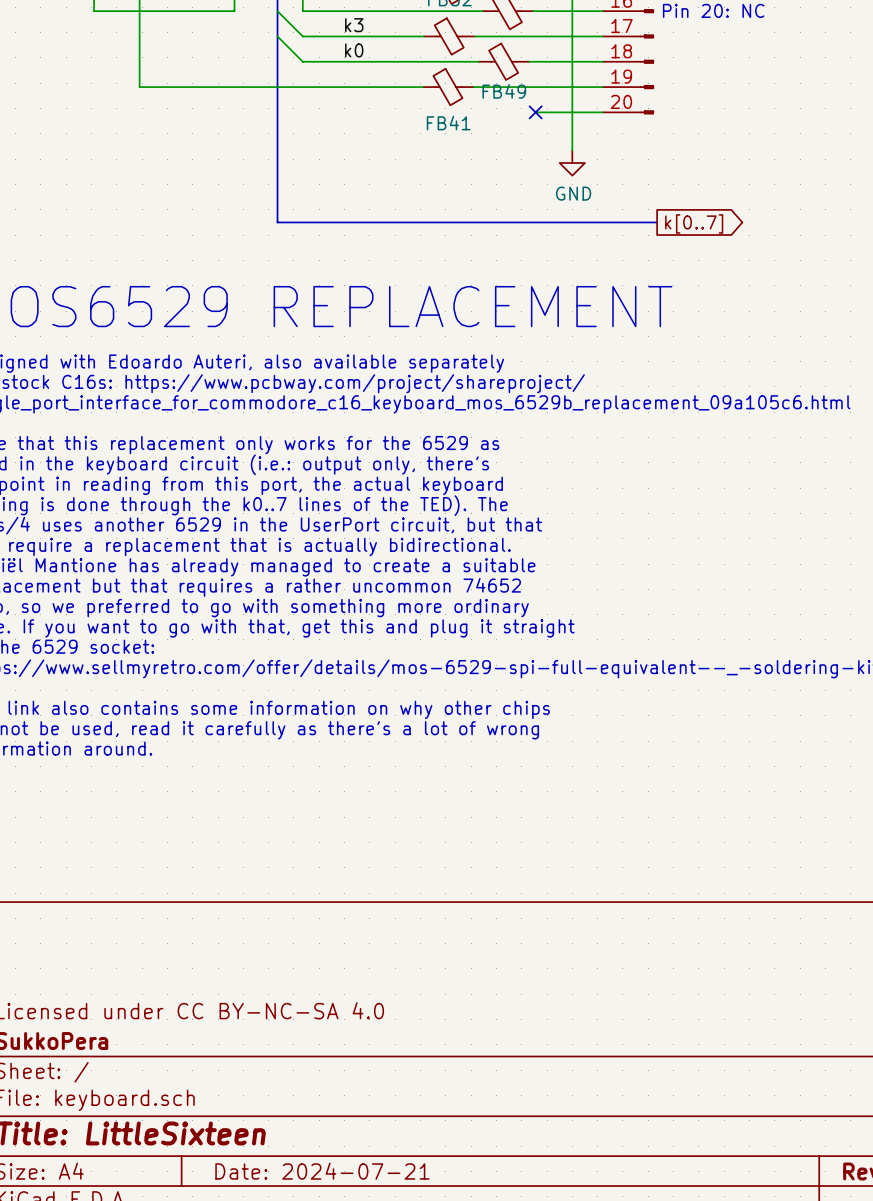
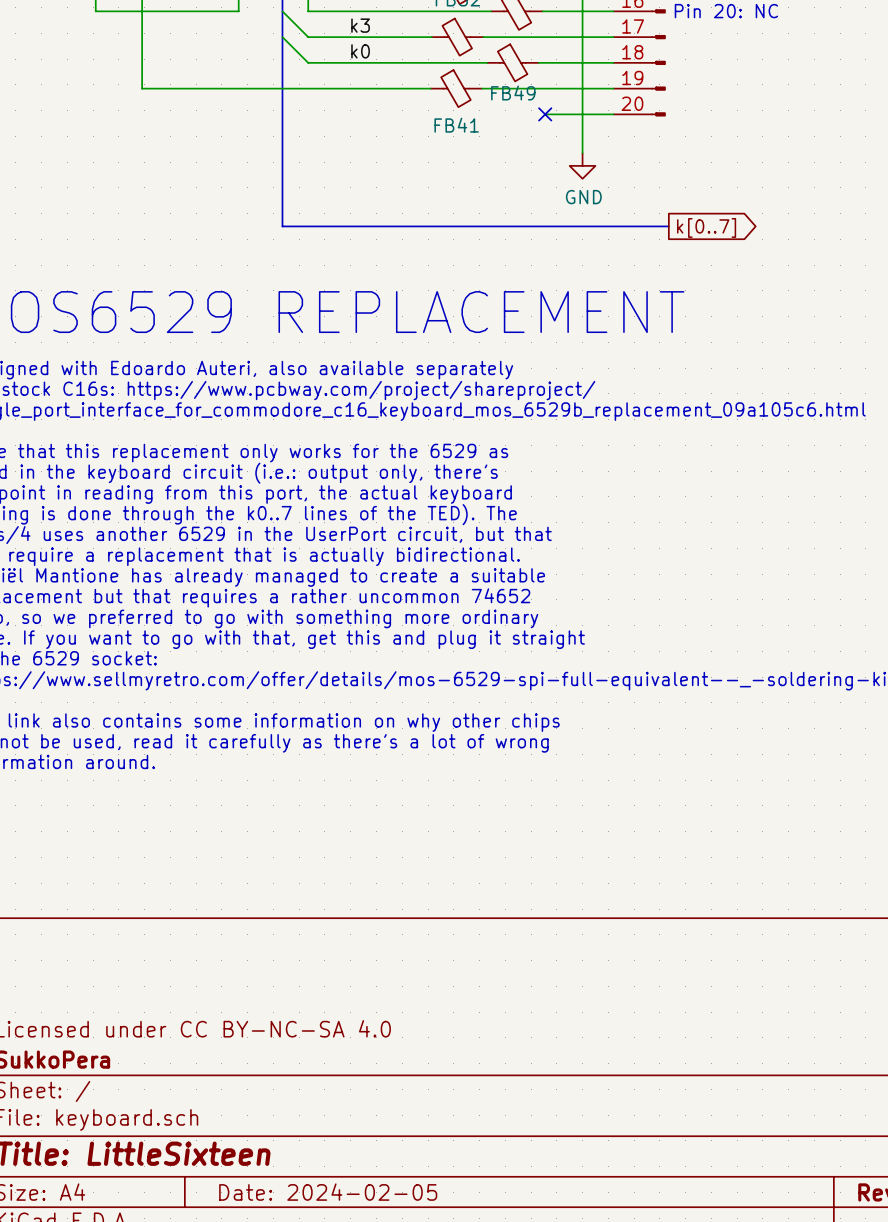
title block: Date: 2024-07-21 (322, 1171) -> Date: 2024-02-05 (328, 1192)

